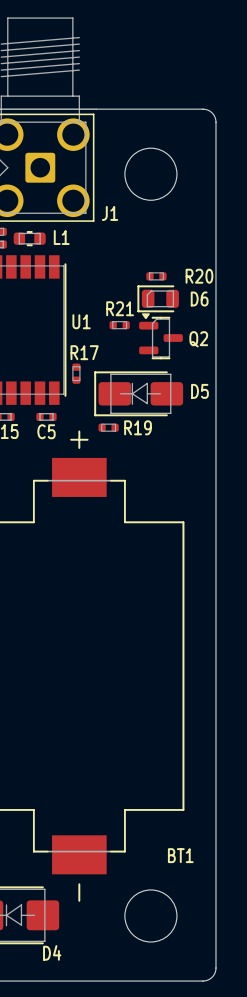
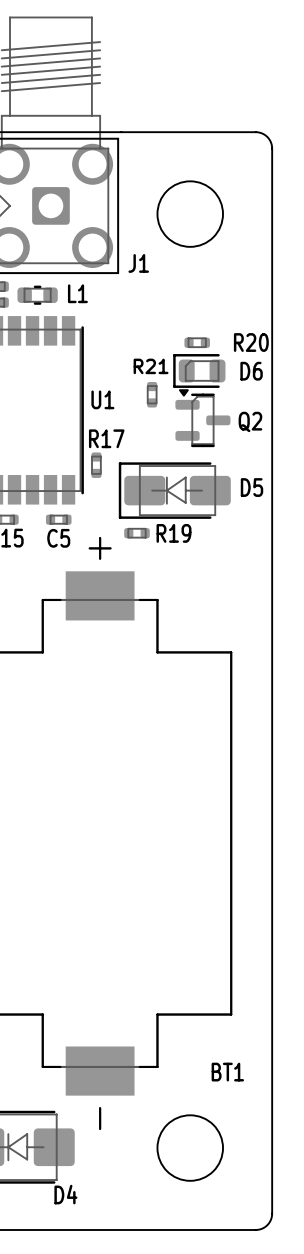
R21 rotation: 0° (119, 325) -> 90° clockwise (152, 394)

